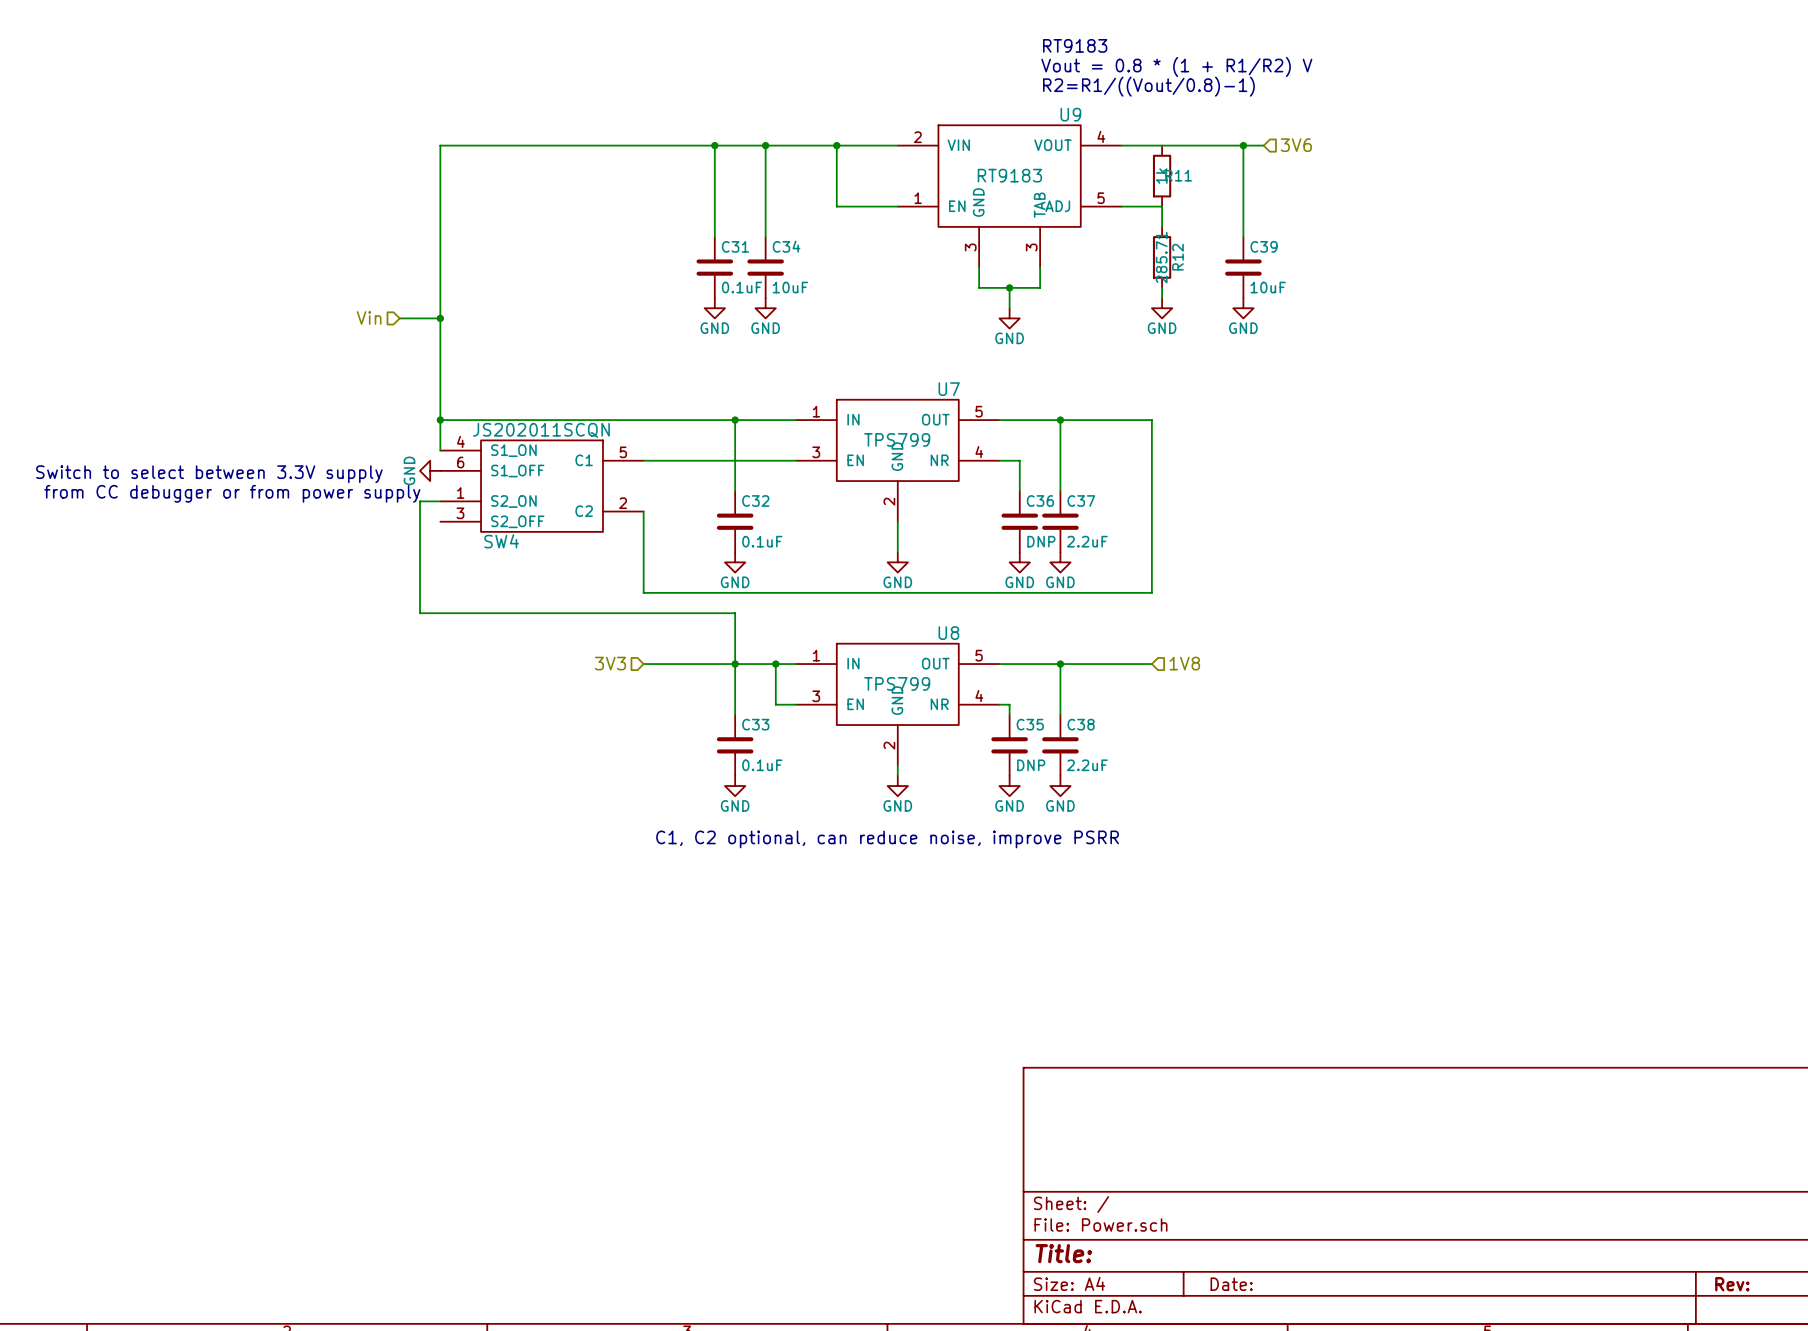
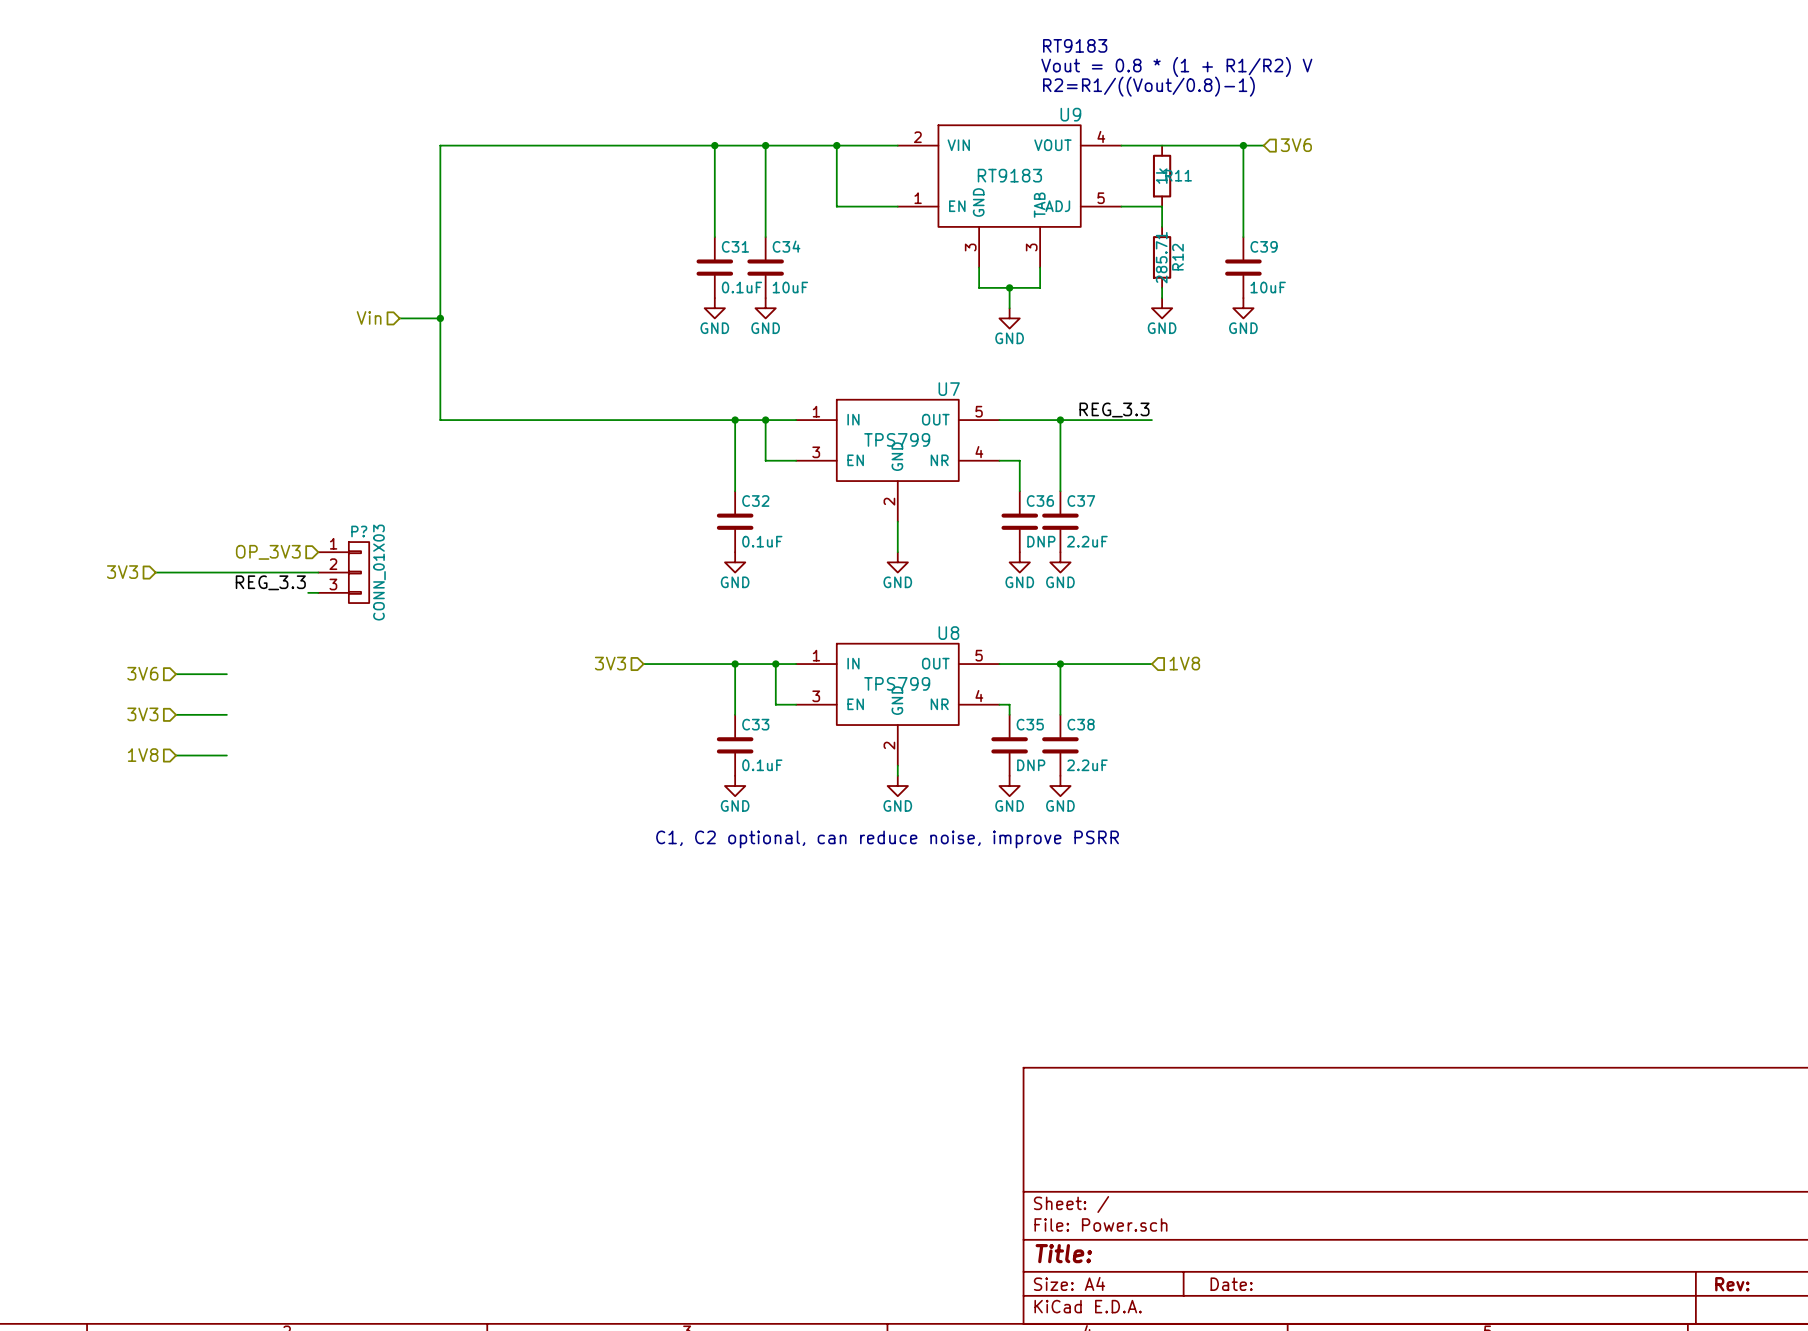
label: none -> REG_3.3 (1114, 410)
wire: (440, 420) (440, 450) -> none
junction: (440, 420) -> none
junction: none -> (765, 420)
wire: (1151, 420) (1151, 592) (643, 592) (643, 511) -> none
wire: (643, 460) (765, 460) -> (765, 420) (765, 460)
power symbol: GND (430, 470) -> none
text: Switch to select between 3.3V supply (209, 474) -> none
SW4: JS202011SCQN (542, 486) -> none
text: from CC debugger or from power supply (232, 493) -> none
wire: (440, 501) (420, 501) (420, 613) (735, 613) (735, 664) -> none
hierarchical label: none -> OP_3V3 (268, 552)
hierarchical label: none -> 3V3 (122, 572)
wire: none -> (155, 572) (318, 572)
P?: none -> CONN_01X03 (343, 572)
label: none -> REG_3.3 (270, 582)
wire: none -> (308, 592) (318, 592)
hierarchical label: none -> 3V6 (142, 673)
wire: none -> (176, 674) (226, 674)
hierarchical label: none -> 3V3 (142, 714)
wire: none -> (176, 714) (226, 714)
hierarchical label: none -> 1V8 (143, 755)
wire: none -> (176, 755) (226, 755)

